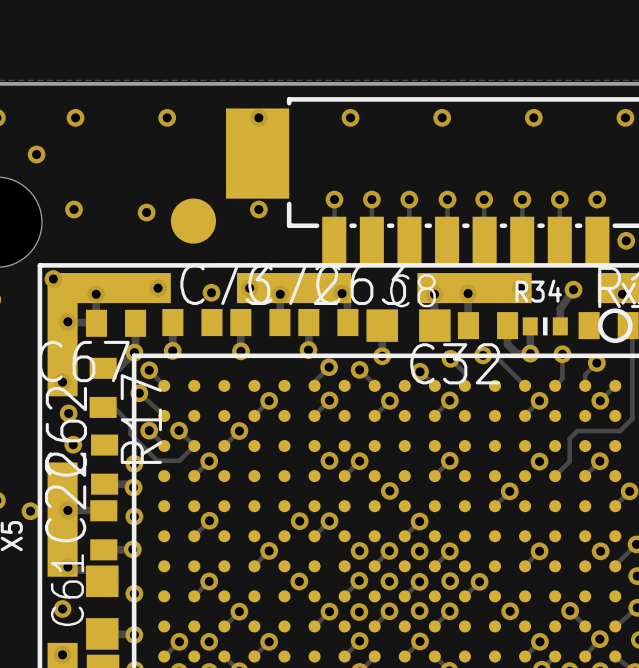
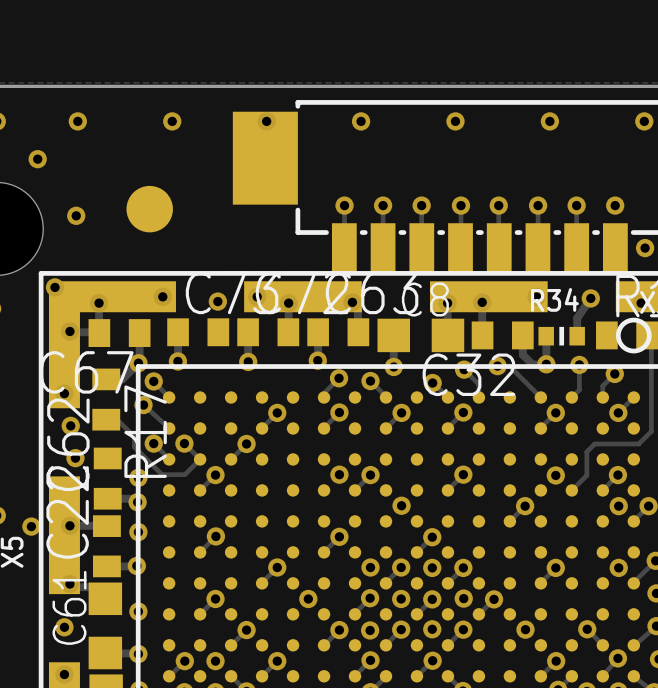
via: (258, 209) -> none
via: (146, 212) -> none
part position: (193, 221) -> (149, 209)
via: none -> (618, 506)
via: (299, 521) -> none

